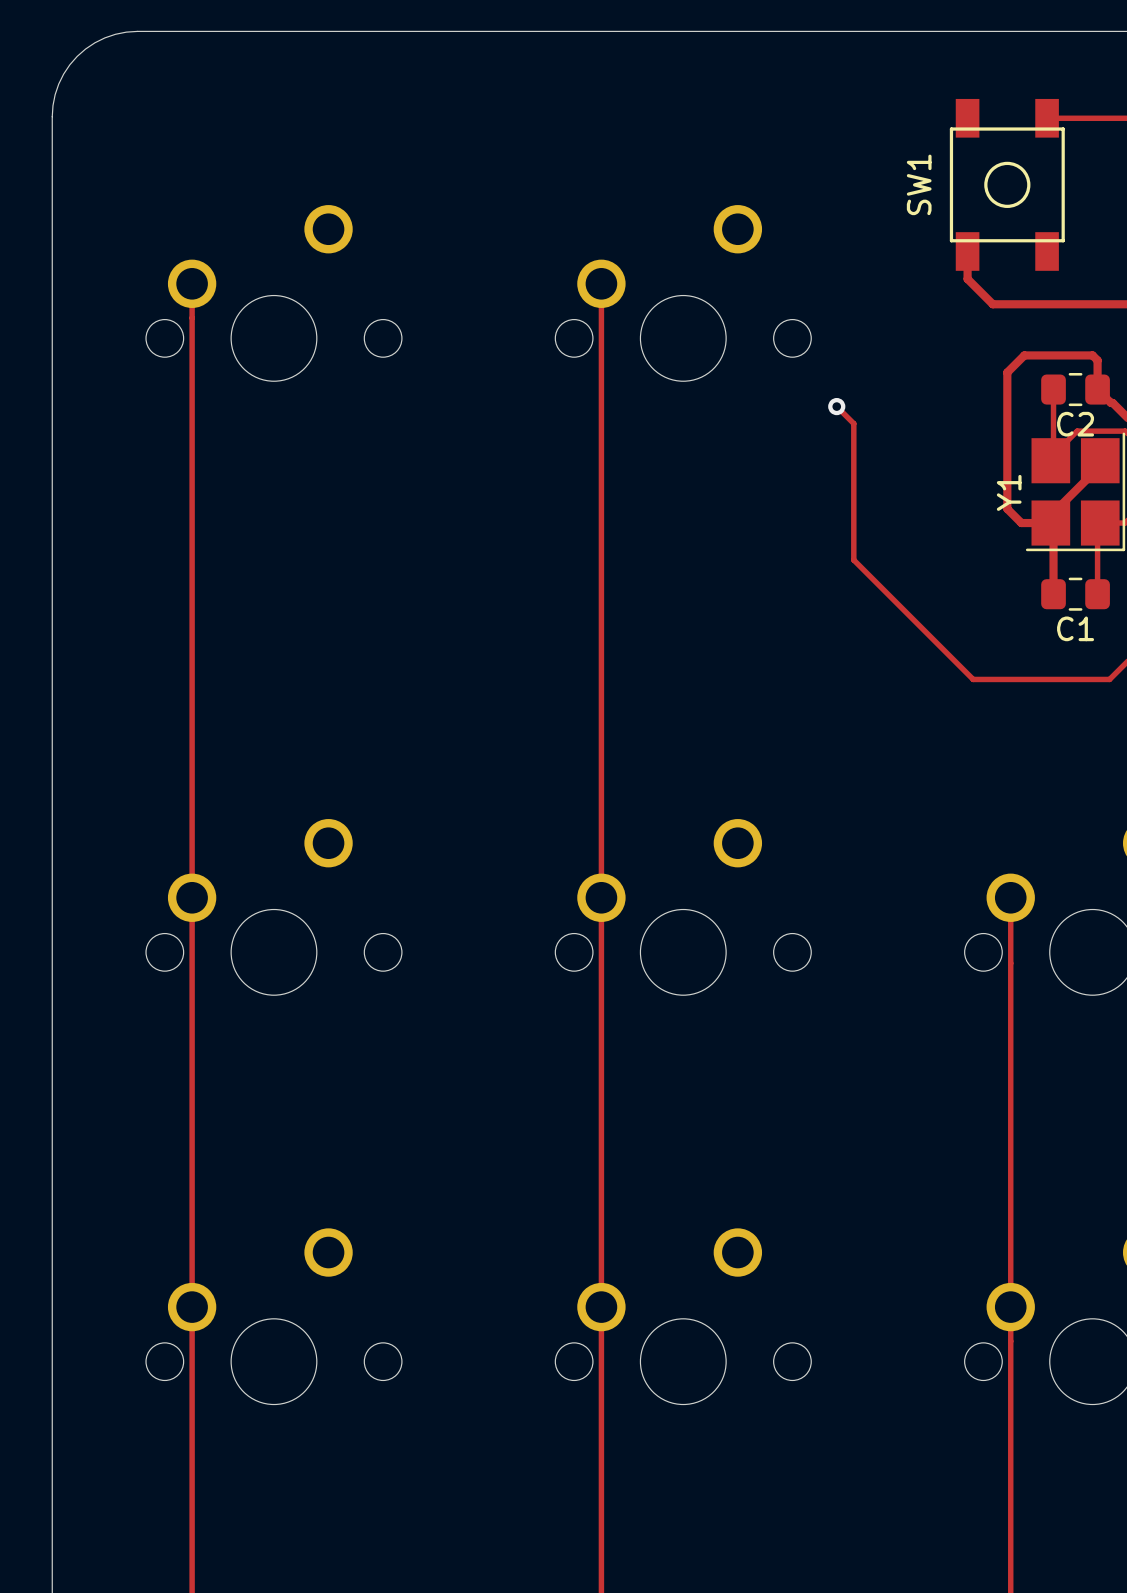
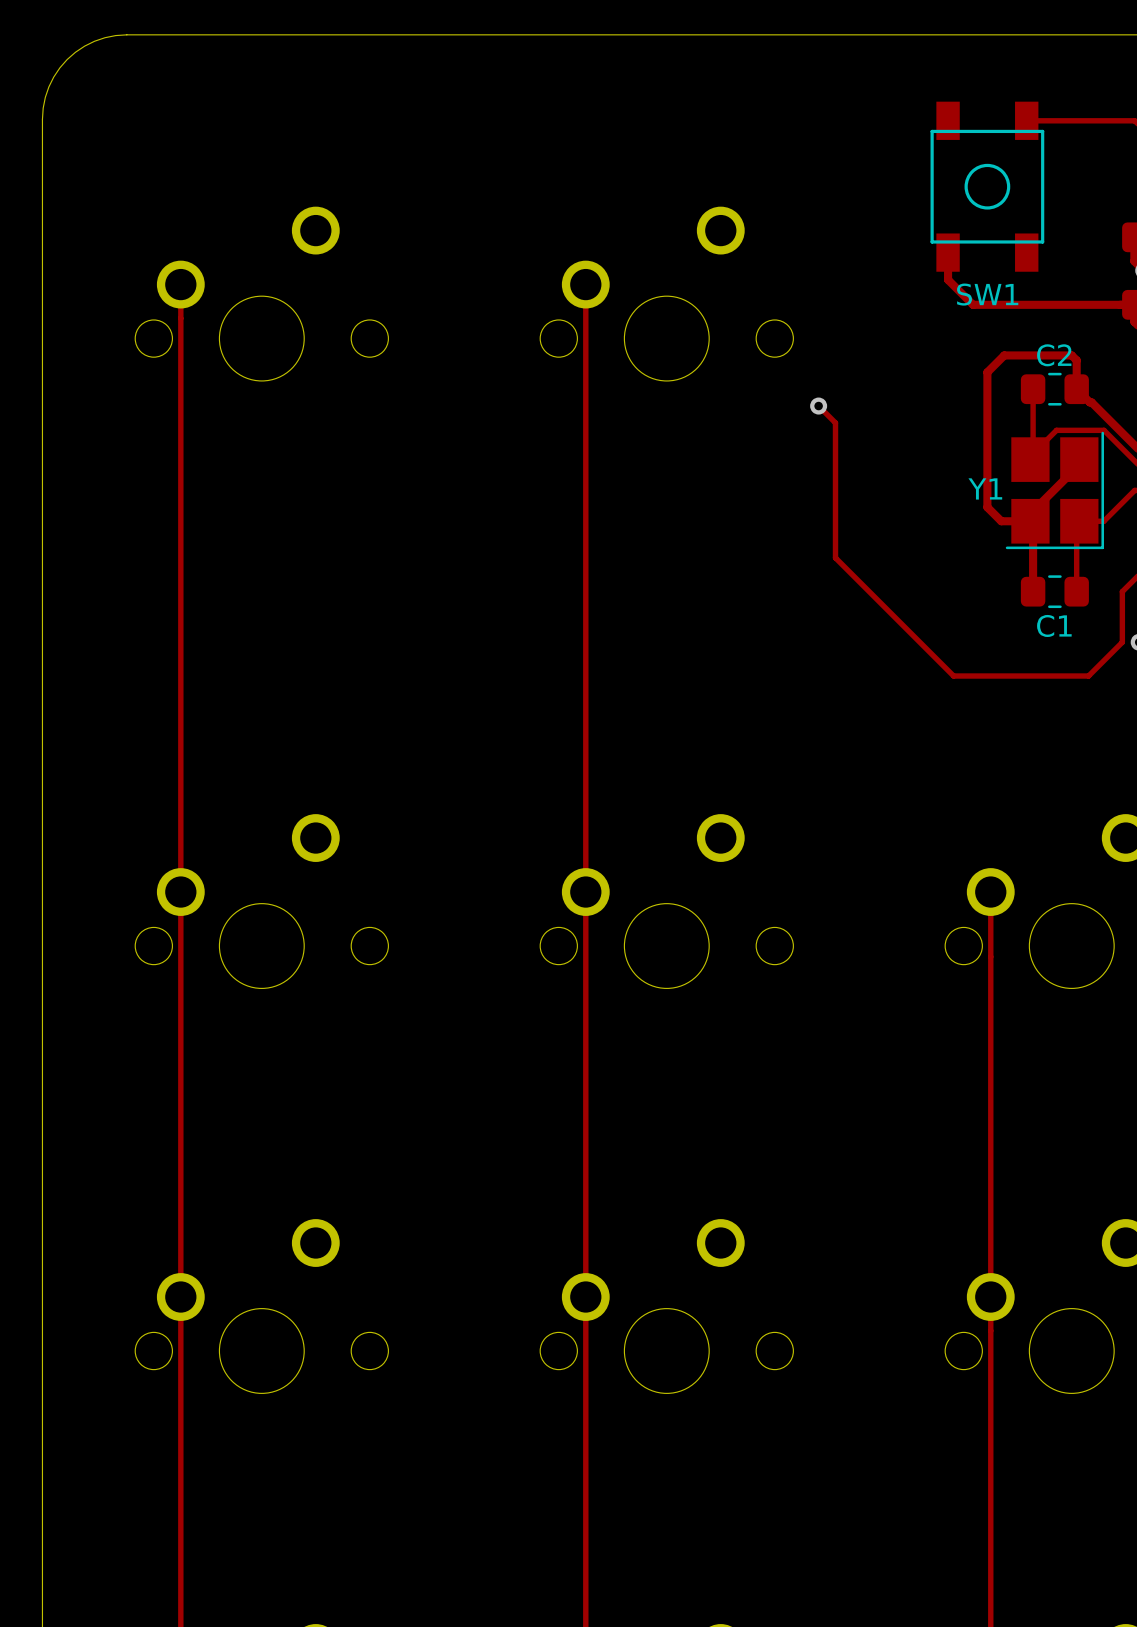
SW1 name rotation: 0° (919, 184) -> 90° clockwise (987, 294)
SW1 name position: SW1 (919, 184) -> SW1 (987, 294)
C2 name position: C2 (1075, 424) -> C2 (1054, 355)
Y1 name rotation: 0° (1009, 492) -> 90° clockwise (985, 488)

